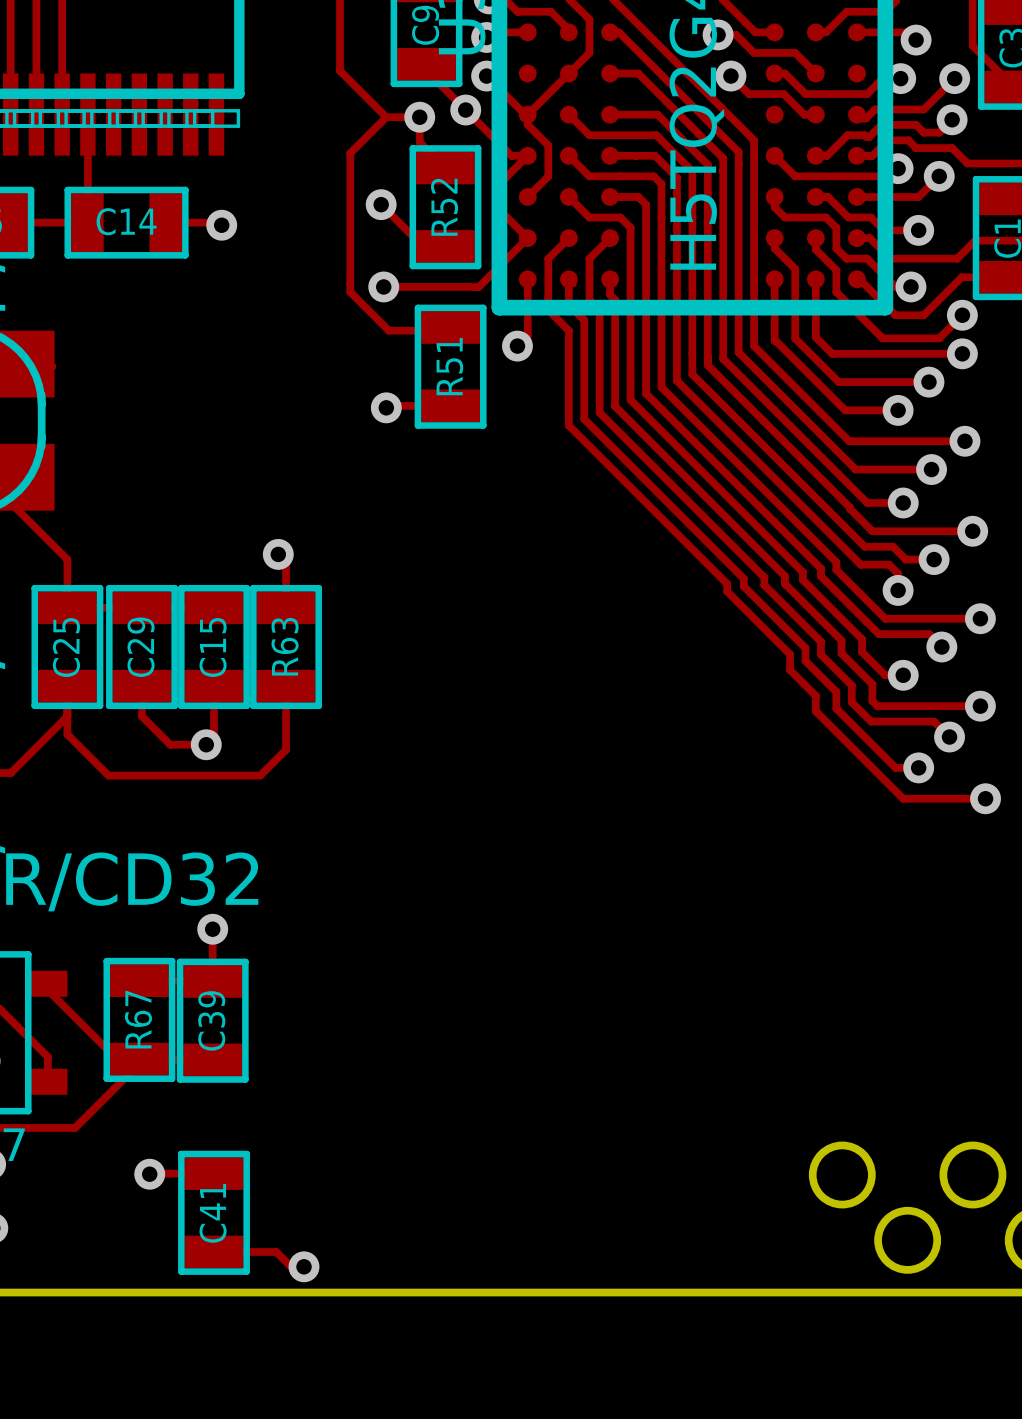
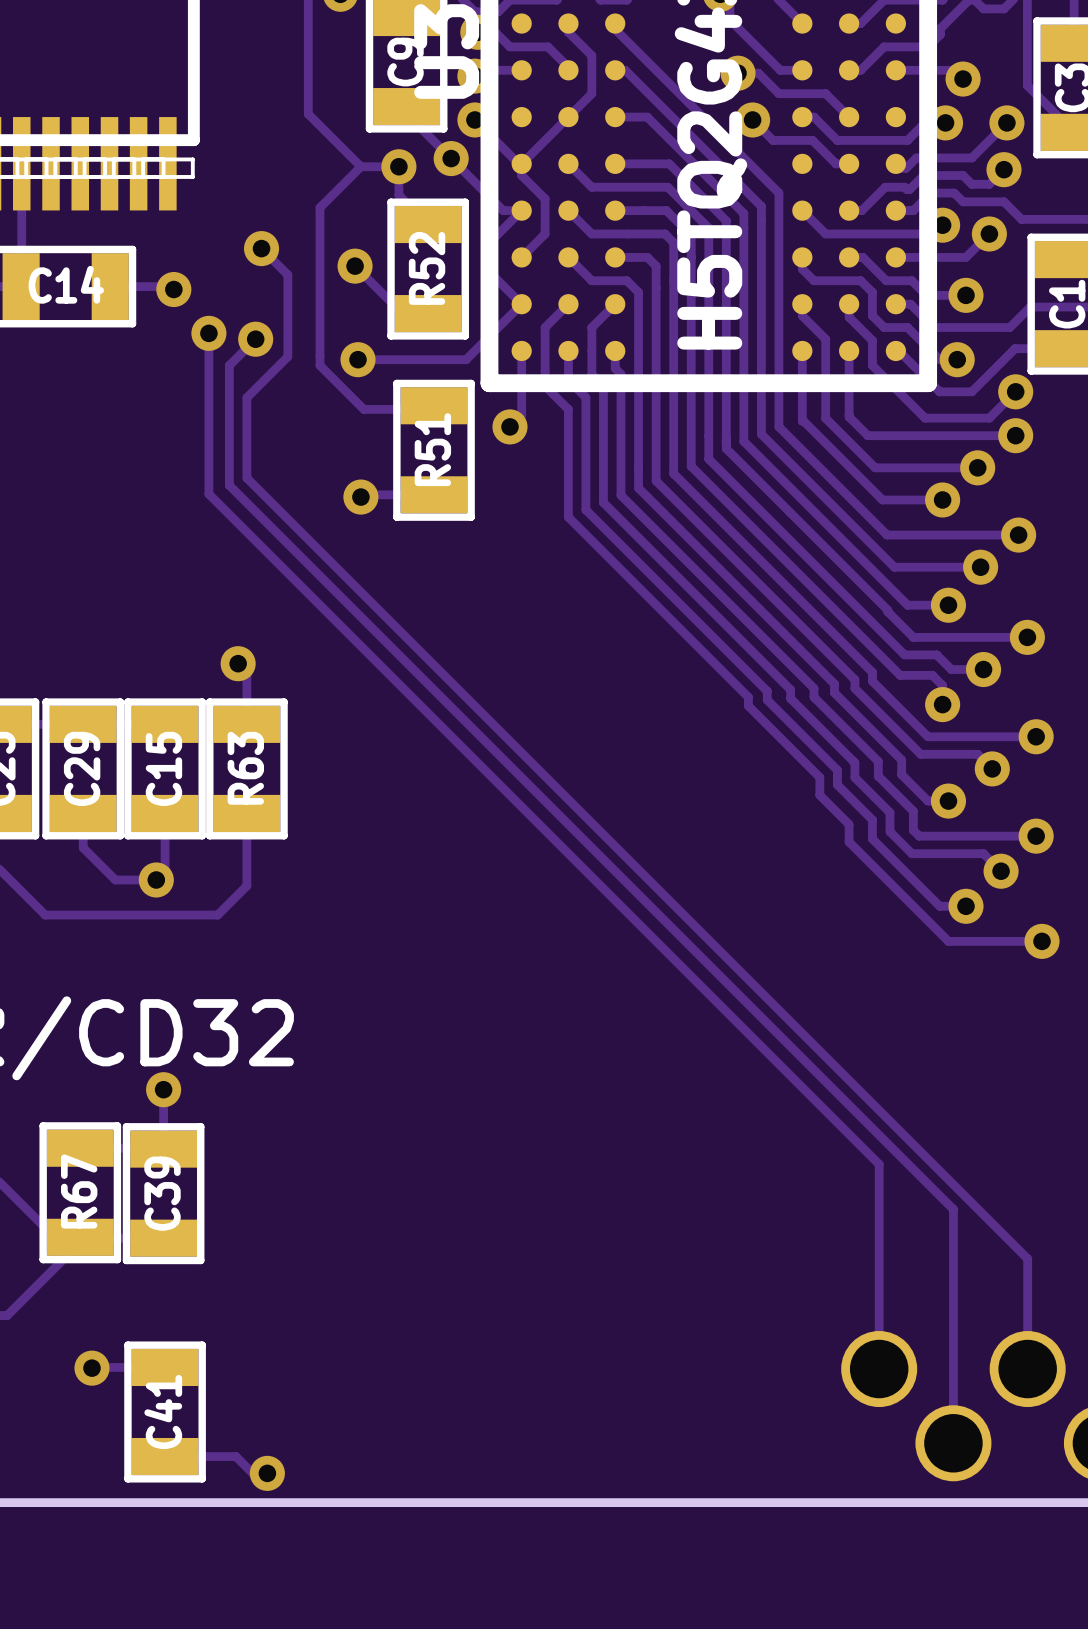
track: none -> (261, 248) (287, 274) (287, 356) (246, 397) (246, 478) (1027, 1258) (1027, 1369)
via: none -> (261, 248)
track: none -> (208, 333) (208, 494) (879, 1164) (879, 1369)
via: none -> (208, 333)
track: none -> (255, 339) (229, 365) (229, 485) (953, 1209) (953, 1443)
via: none -> (255, 339)

